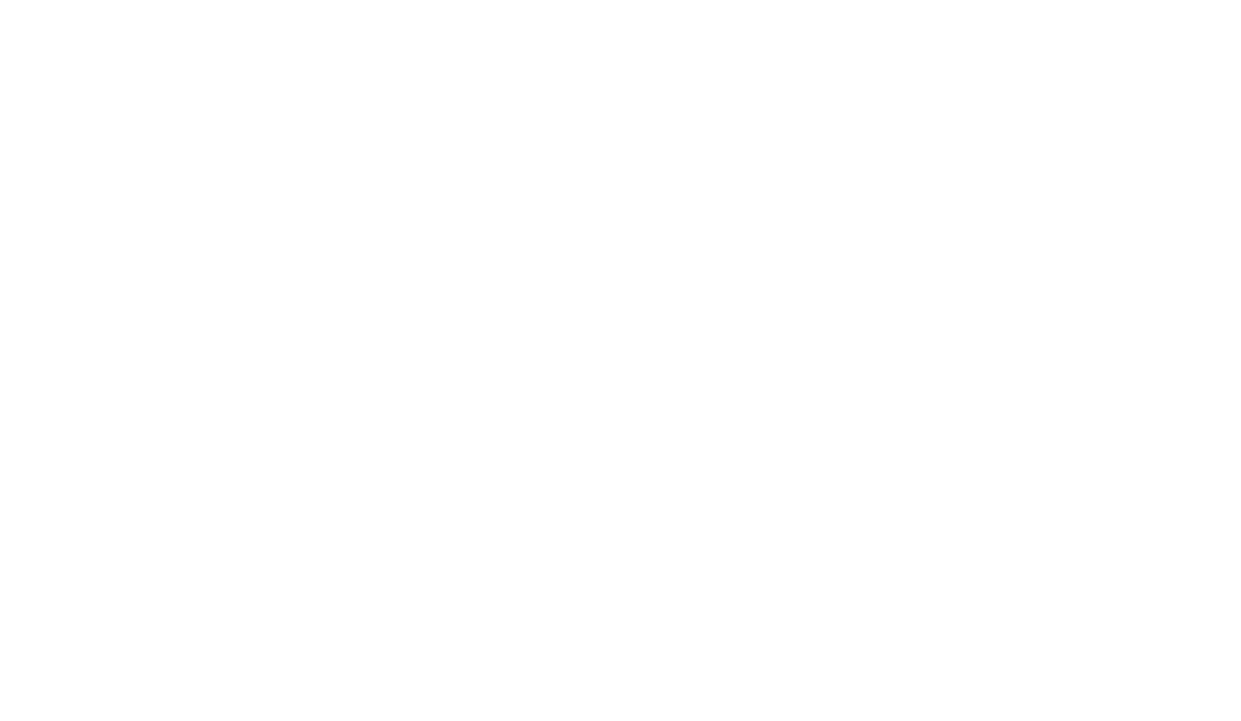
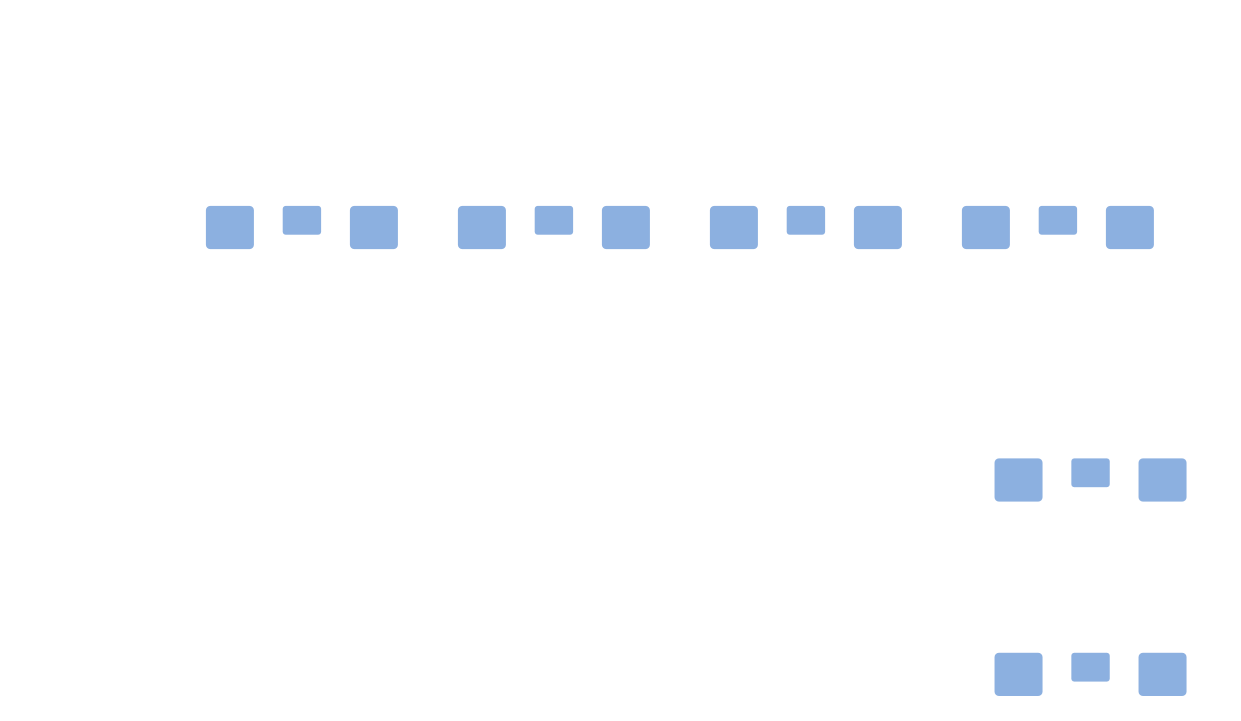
part: none -> (301, 227)
part: none -> (553, 227)
part: none -> (805, 227)
part: none -> (1057, 227)
part: none -> (1090, 479)
part: none -> (1090, 674)

